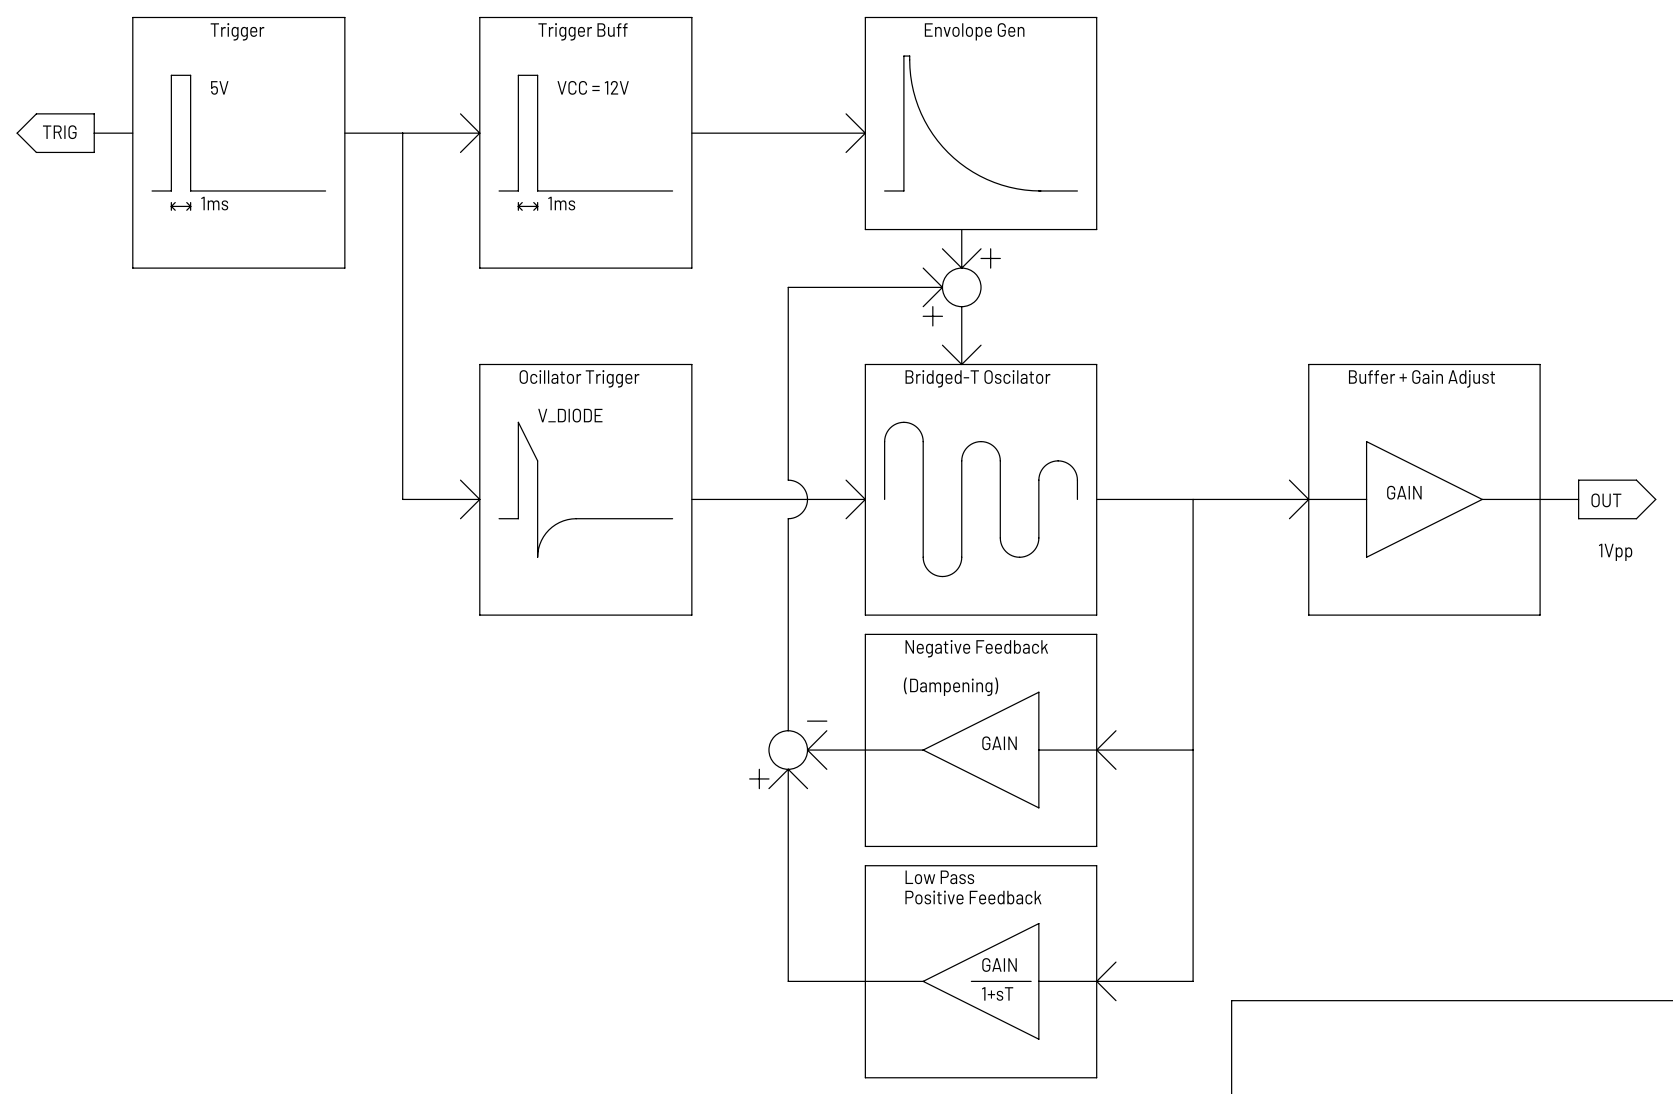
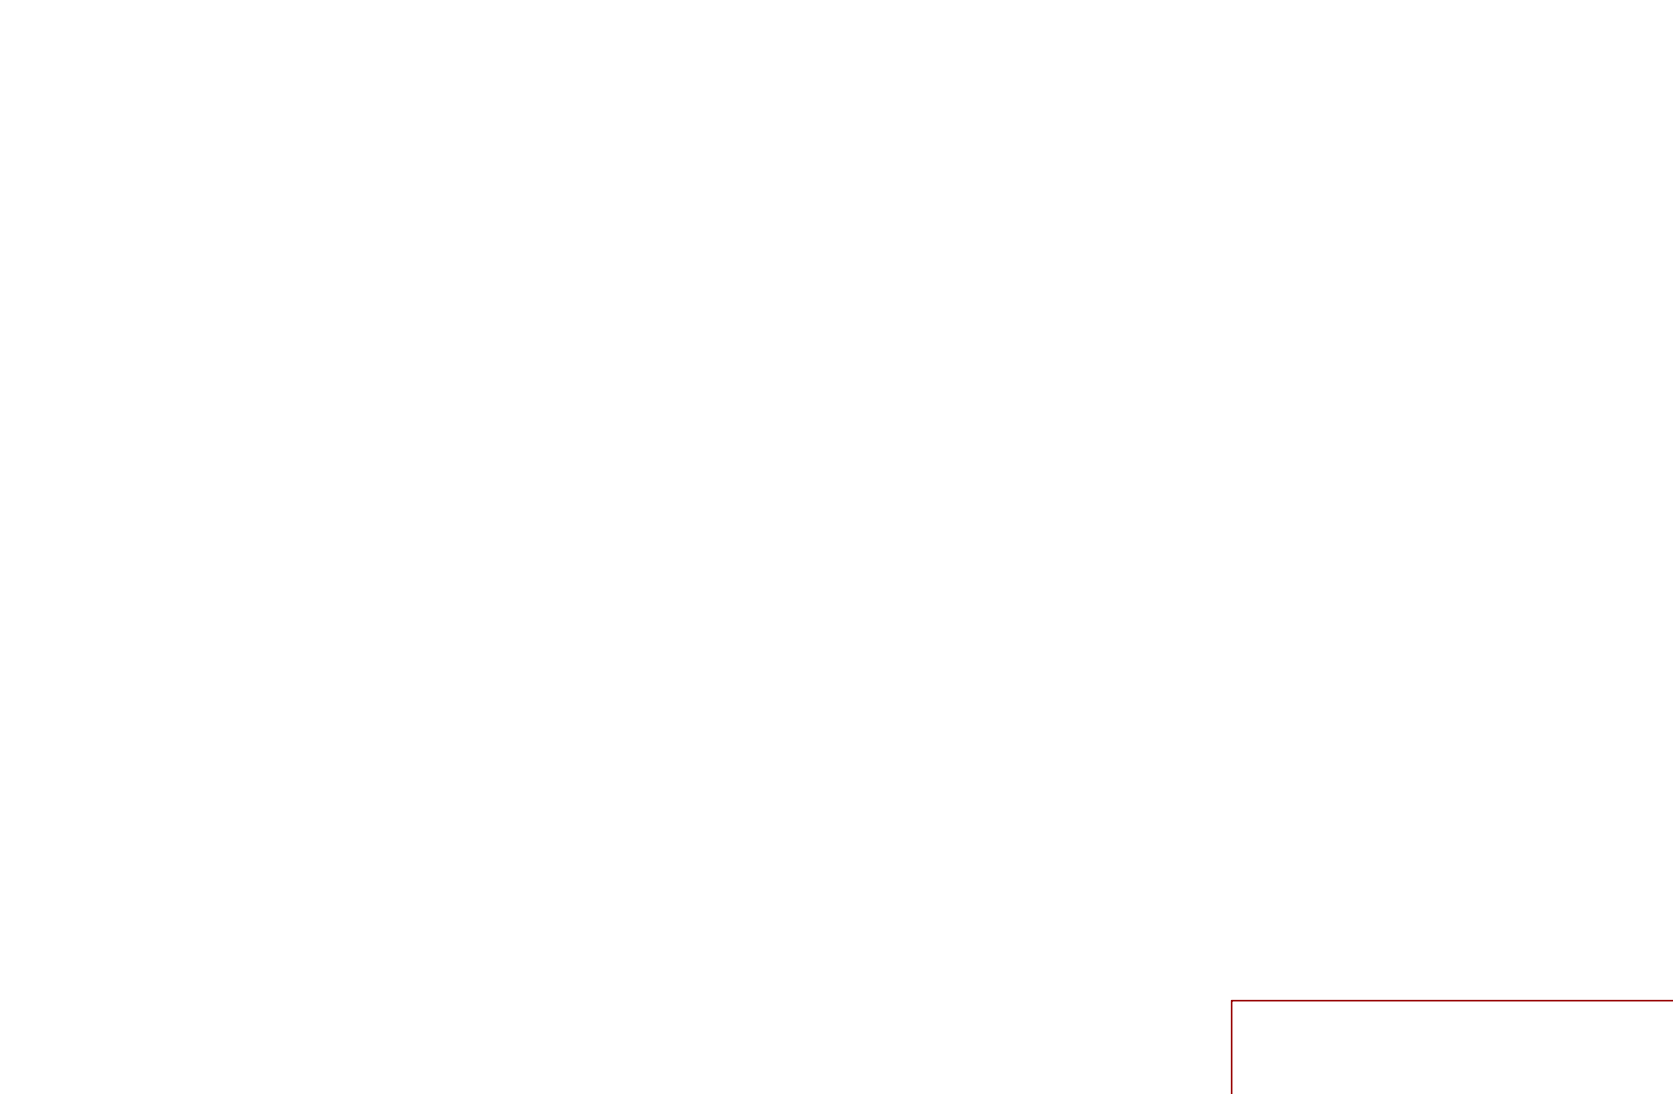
wire: (132, 17) (132, 268) (344, 268) (344, 17) (132, 17) -> none
wire: (479, 17) (691, 17) (691, 268) (479, 268) (479, 17) -> none
wire: (865, 17) (1096, 17) (1096, 229) (865, 229) (865, 17) -> none
text: Trigger (237, 31) -> none
text: Trigger Buff (583, 31) -> none
text: Envolope Gen (974, 31) -> none
text: 5V (219, 87) -> none
text: VCC = 12V (593, 87) -> none
line: (36, 113) (94, 113) (94, 152) (36, 152) (17, 133) (36, 113) -> none
line: (460, 113) (479, 133) -> none
line: (846, 113) (865, 133) -> none
text: TRIG (59, 132) -> none
line: (94, 133) (132, 133) -> none
line: (344, 133) (479, 133) -> none
line: (402, 133) (402, 499) (479, 499) -> none
line: (479, 133) (460, 152) -> none
line: (691, 133) (865, 133) -> none
line: (865, 133) (846, 152) -> none
line: (152, 190) (171, 190) (171, 75) (190, 75) (190, 190) (325, 190) -> none
line: (499, 190) (518, 190) (518, 75) (537, 75) (537, 190) (672, 190) -> none
line: (884, 190) (903, 190) (903, 56) (909, 56) (911, 83) (921, 113) (932, 134) (948, 152) (972, 172) (994, 182) (1017, 188) (1040, 190) -> none
line: (1038, 190) (1077, 190) -> none
line: (171, 202) (171, 210) -> none
line: (175, 202) (171, 206) -> none
line: (186, 202) (190, 206) -> none
line: (190, 202) (190, 210) -> none
line: (518, 202) (518, 210) -> none
line: (522, 202) (518, 206) -> none
line: (533, 202) (537, 206) -> none
line: (537, 202) (537, 210) -> none
text: 1ms (214, 203) -> none
text: 1ms (561, 203) -> none
line: (171, 206) (175, 210) -> none
line: (171, 206) (190, 206) -> none
line: (190, 206) (186, 210) -> none
line: (518, 206) (537, 206) -> none
line: (518, 206) (522, 210) -> none
line: (537, 206) (533, 210) -> none
line: (961, 229) (961, 268) -> none
line: (942, 248) (961, 268) -> none
line: (981, 248) (961, 268) -> none
line: (990, 248) (990, 268) -> none
line: (981, 258) (1000, 258) -> none
drawing: [941, 267, 982, 308] -> none
line: (923, 268) (942, 287) -> none
line: (942, 287) (788, 287) (788, 480) (801, 485) (807, 499) (801, 513) (788, 518) (788, 730) -> none
line: (942, 287) (923, 306) -> none
line: (932, 306) (932, 325) -> none
line: (961, 306) (961, 364) -> none
line: (923, 316) (942, 316) -> none
line: (942, 345) (961, 364) -> none
line: (981, 345) (961, 364) -> none
wire: (479, 364) (479, 615) (691, 615) (691, 364) (479, 364) -> none
wire: (865, 364) (865, 615) (1096, 615) (1096, 364) (865, 364) -> none
wire: (1308, 364) (1540, 364) (1540, 615) (1308, 615) (1308, 364) -> none
text: Ocillator Trigger (579, 378) -> none
text: Bridged-T Oscilator (978, 378) -> none
text: Buffer + Gain Adjust (1421, 378) -> none
text: V_DIODE (570, 415) -> none
line: (460, 480) (479, 499) -> none
line: (846, 480) (865, 499) -> none
line: (1289, 480) (1308, 499) (1289, 518) -> none
line: (1578, 480) (1578, 518) (1636, 518) (1655, 499) (1636, 480) (1578, 480) -> none
text: GAIN (1404, 492) -> none
line: (479, 499) (460, 518) -> none
line: (691, 499) (865, 499) -> none
line: (865, 499) (846, 518) -> none
line: (884, 499) (885, 436) (892, 426) (903, 422) (915, 426) (922, 436) (923, 559) (927, 569) (935, 575) (949, 575) (956, 570) (961, 562) (961, 458) (965, 449) (971, 444) (986, 442) (994, 447) (998, 453) (1000, 540) (1004, 549) (1009, 554) (1024, 556) (1033, 551) (1037, 545) (1039, 477) (1046, 464) (1060, 461) (1071, 466) (1077, 477) (1077, 499) -> none
line: (1096, 499) (1366, 499) -> none
line: (1193, 499) (1193, 981) (1038, 981) -> none
line: (1482, 499) (1578, 499) -> none
line: (1482, 499) (1366, 557) (1366, 441) (1482, 499) -> none
text: OUT (1606, 500) -> none
line: (499, 518) (518, 518) (518, 422) (537, 460) (537, 557) (539, 544) (546, 533) (555, 524) (567, 519) (672, 518) -> none
text: 1Vpp (1615, 552) -> none
wire: (865, 634) (865, 846) (1096, 846) (1096, 634) (865, 634) -> none
text: Negative Feedback (976, 648) -> none
text: (Dampening) (951, 686) -> none
line: (807, 721) (826, 721) -> none
drawing: [768, 730, 809, 770] -> none
line: (826, 730) (807, 750) -> none
line: (1115, 730) (1096, 750) (1115, 769) -> none
text: GAIN (999, 743) -> none
line: (807, 750) (923, 750) -> none
line: (807, 750) (826, 769) -> none
line: (923, 750) (1038, 807) (1038, 692) (923, 750) -> none
line: (1038, 750) (1193, 750) -> none
line: (759, 769) (759, 788) -> none
line: (788, 769) (768, 788) -> none
line: (788, 769) (807, 788) -> none
line: (788, 769) (788, 981) (923, 981) -> none
line: (749, 778) (768, 778) -> none
wire: (865, 865) (865, 1077) (1096, 1077) (1096, 865) (865, 865) -> none
text: Low Pass (939, 877) -> none
text: Positive Feedback (973, 897) -> none
line: (1115, 962) (1096, 981) (1115, 1000) -> none
text: GAIN (999, 964) -> none
line: (923, 981) (1038, 1039) (1038, 923) (923, 981) -> none
line: (971, 981) (1031, 981) -> none
text: 1+sT (997, 993) -> none

